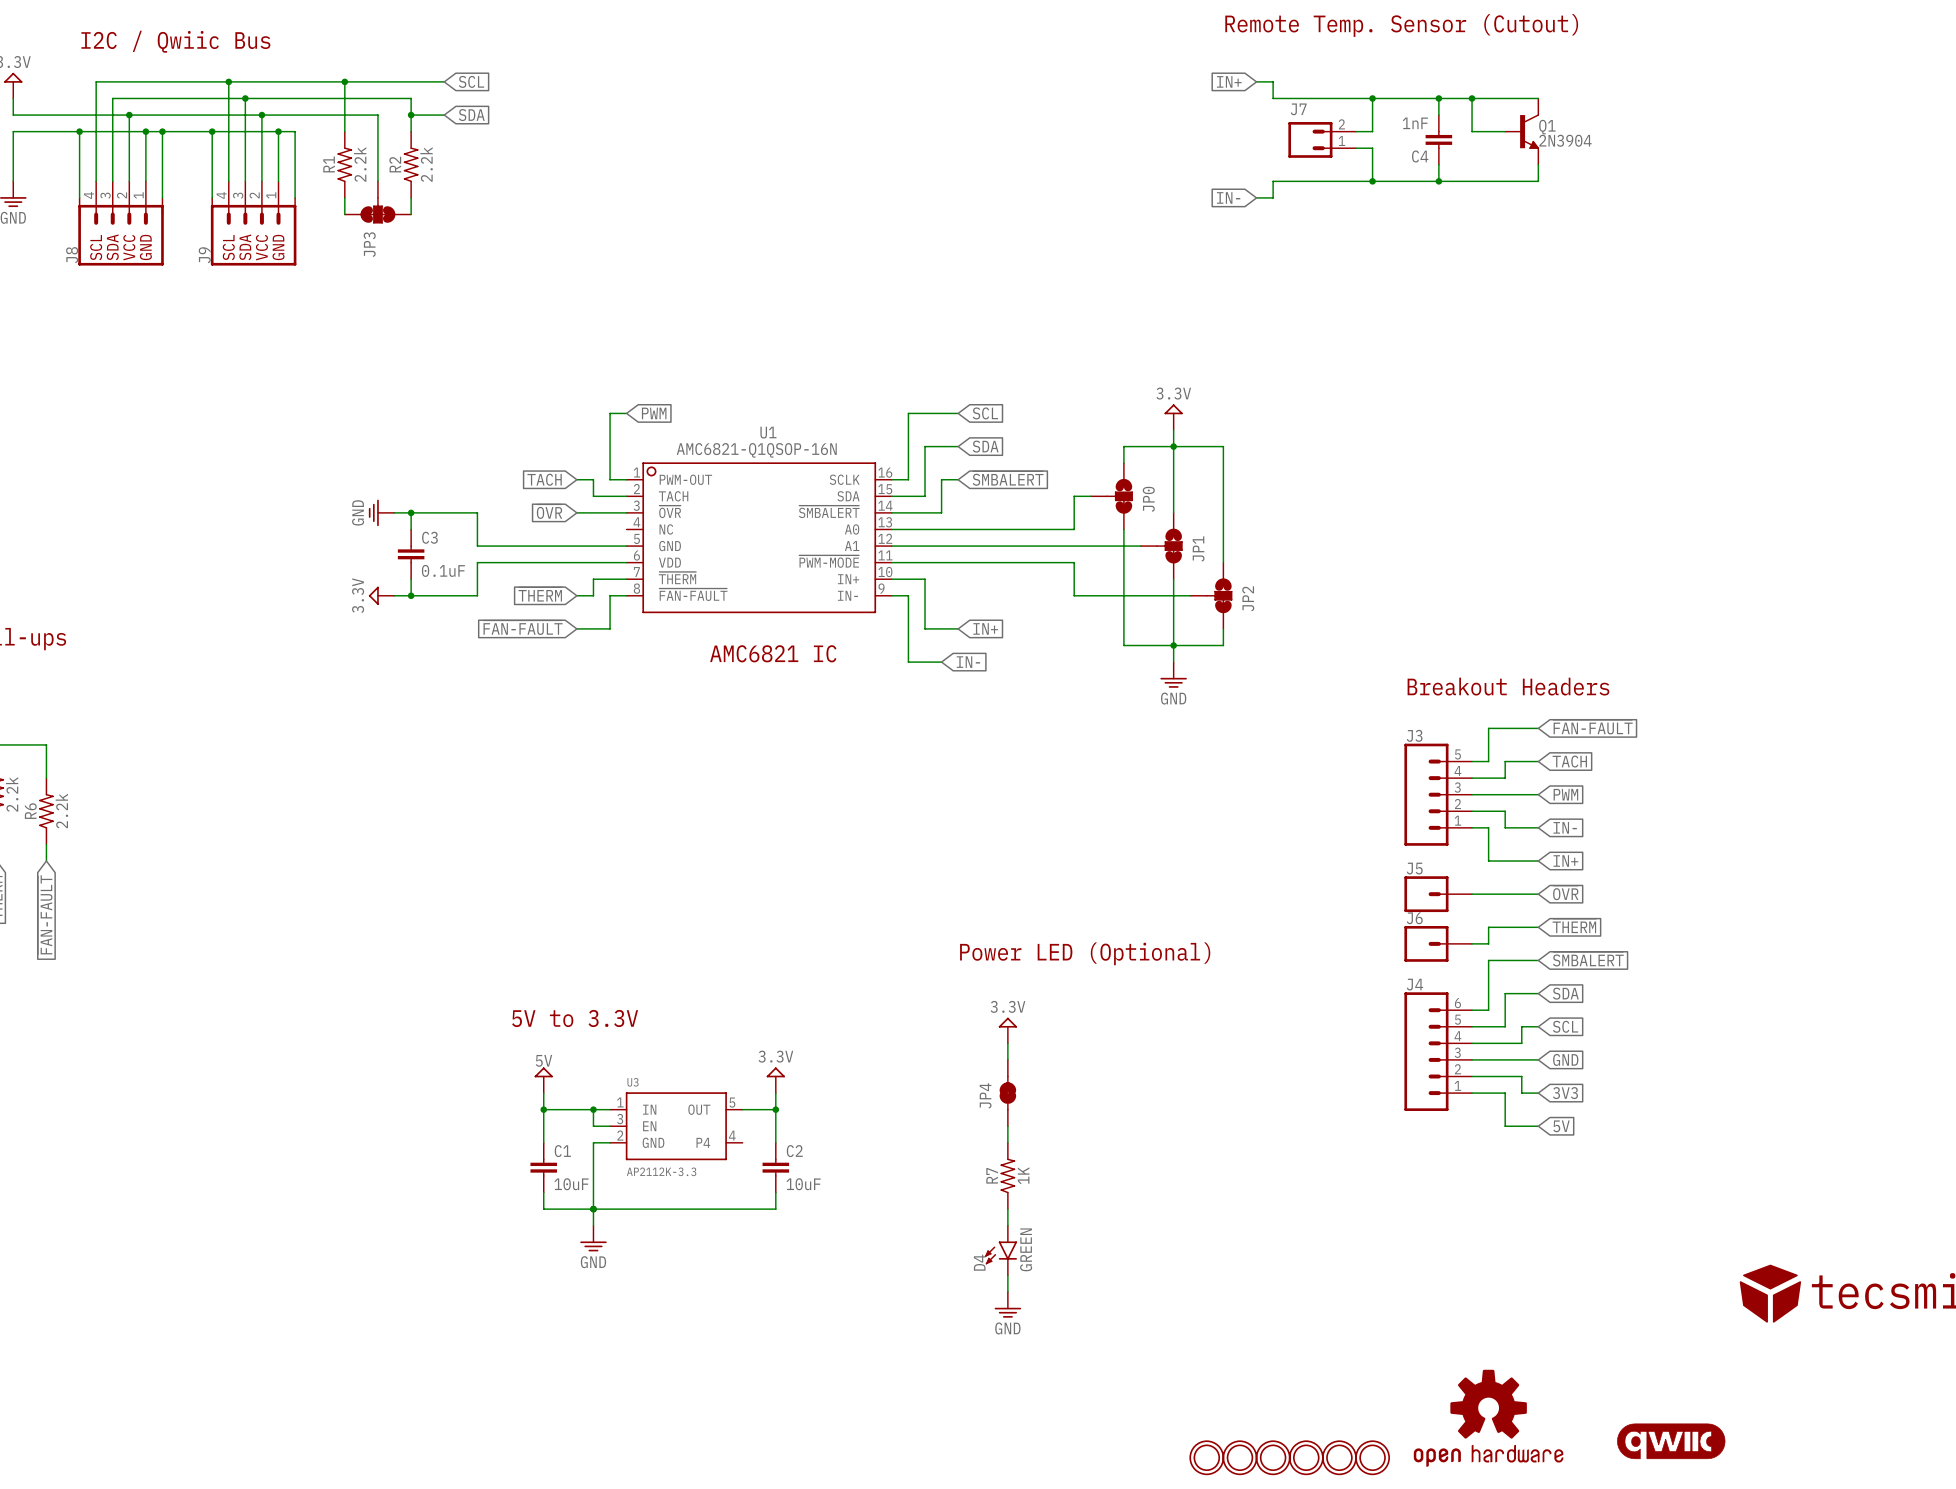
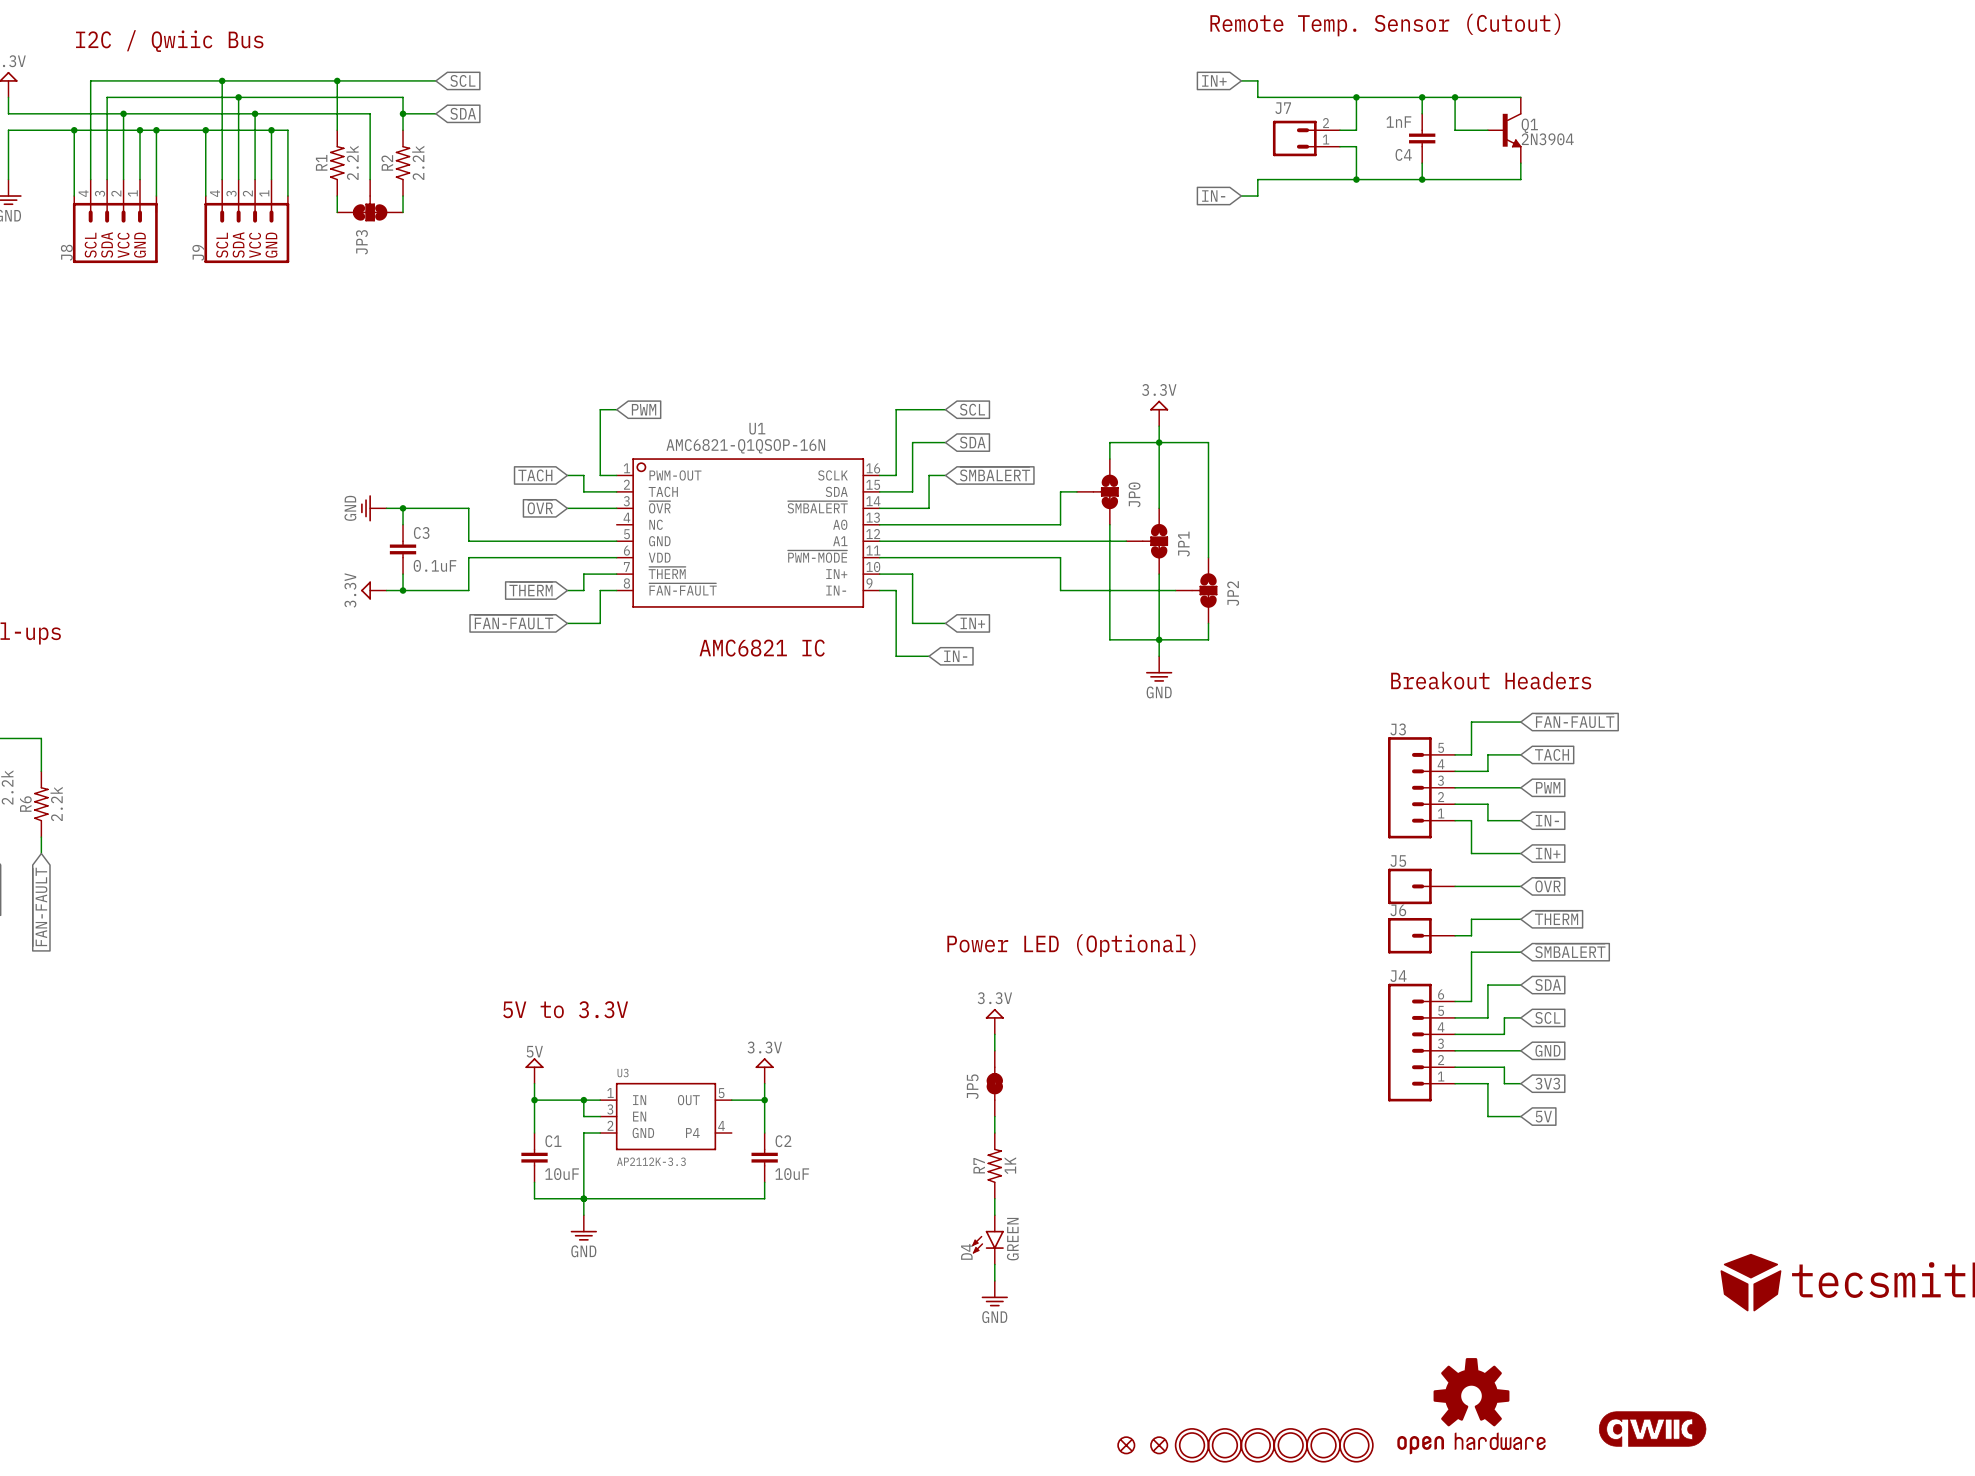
JP4 name: JP4 (985, 1095) -> JP5 (972, 1086)
part: none -> (1126, 1445)
part: none -> (1159, 1445)

